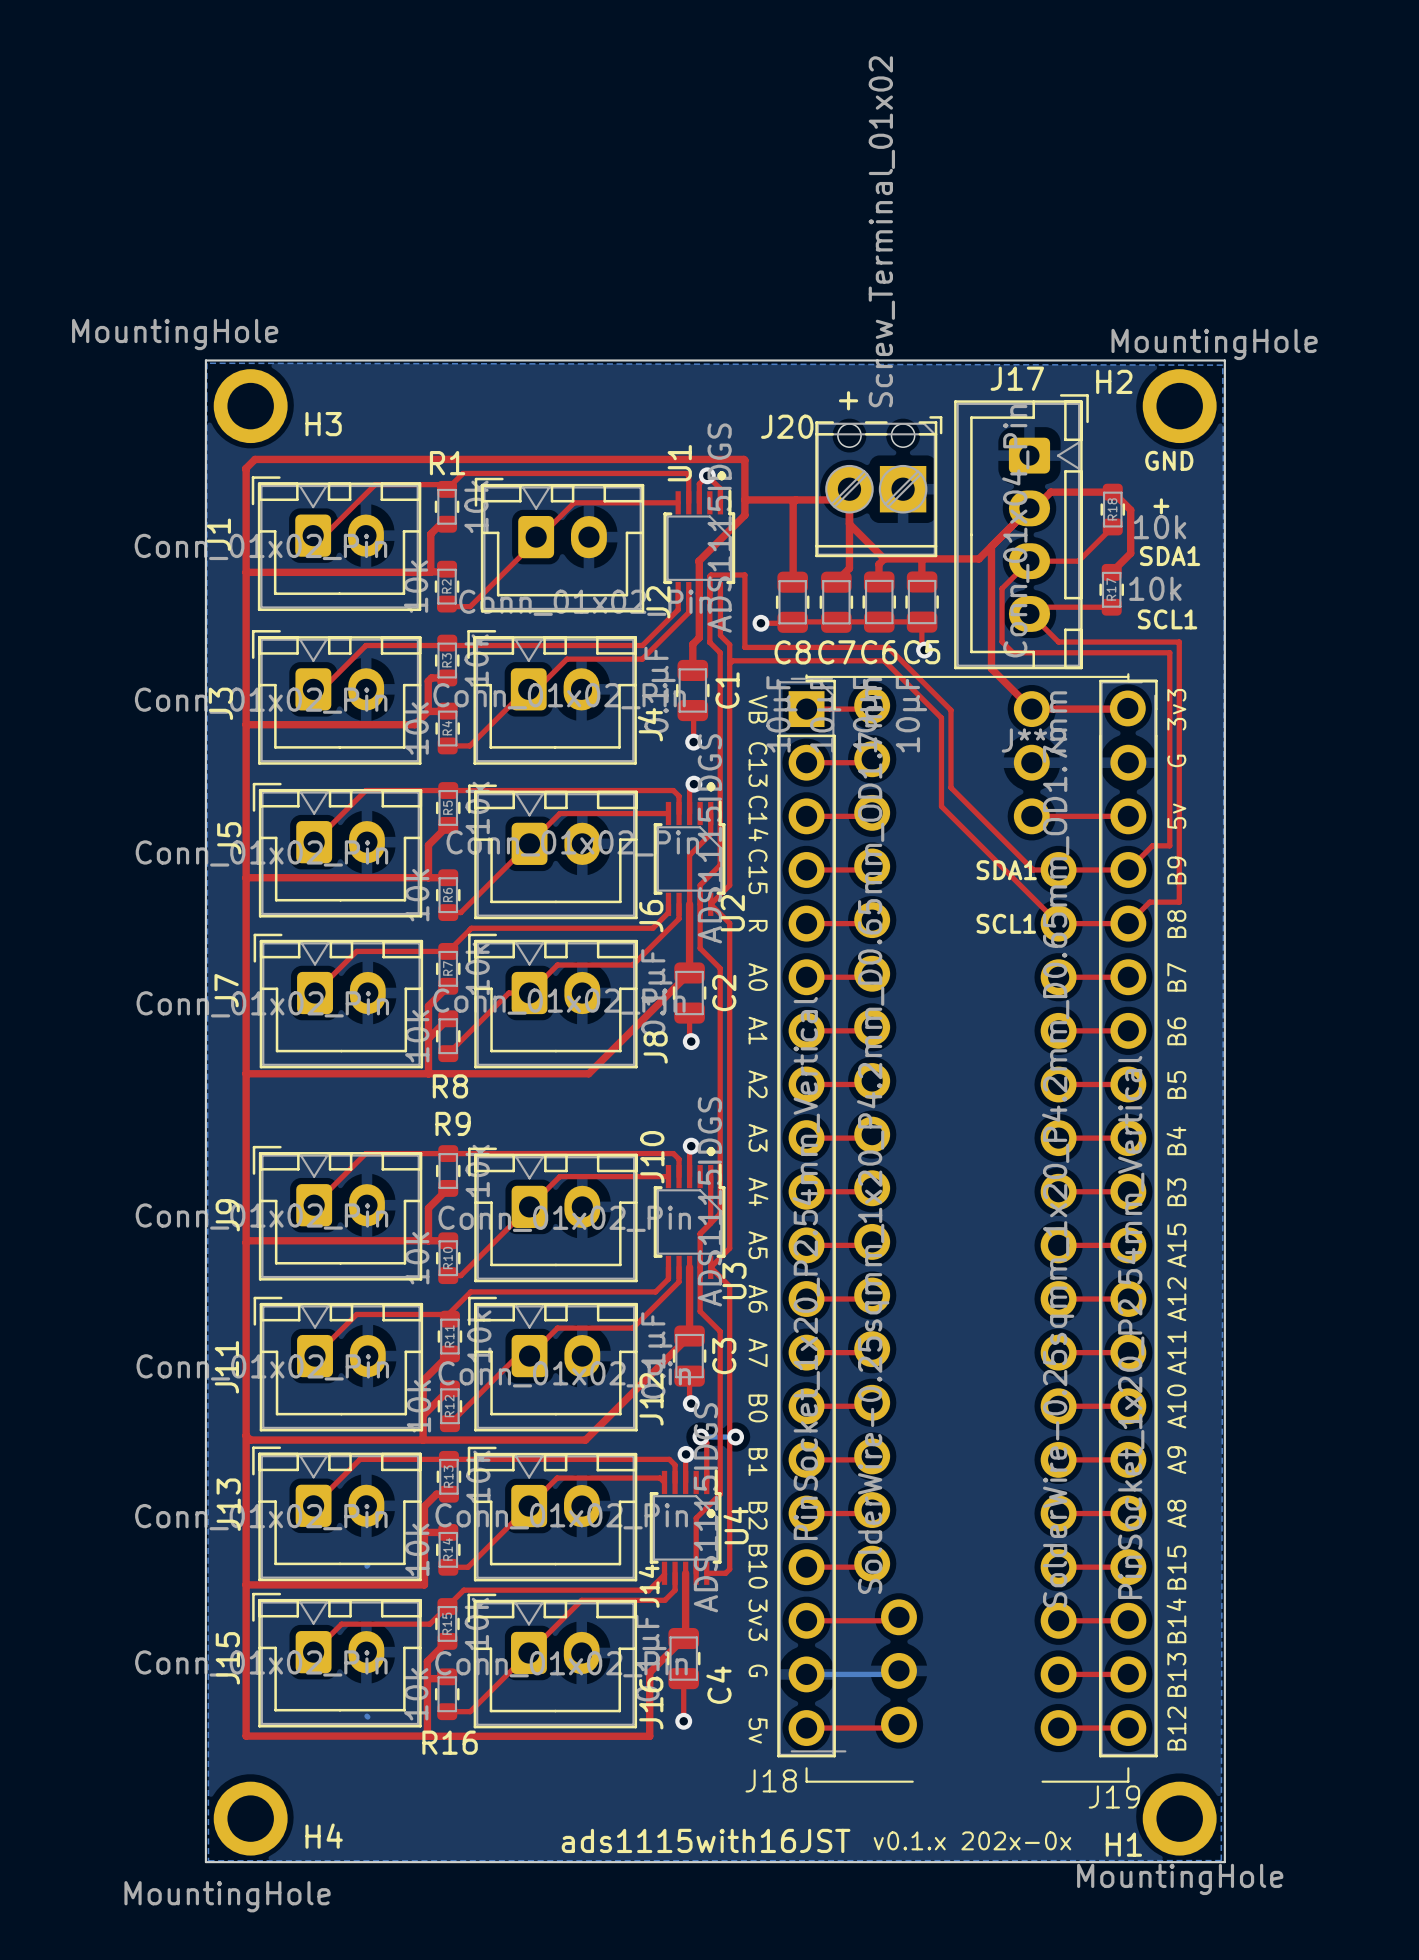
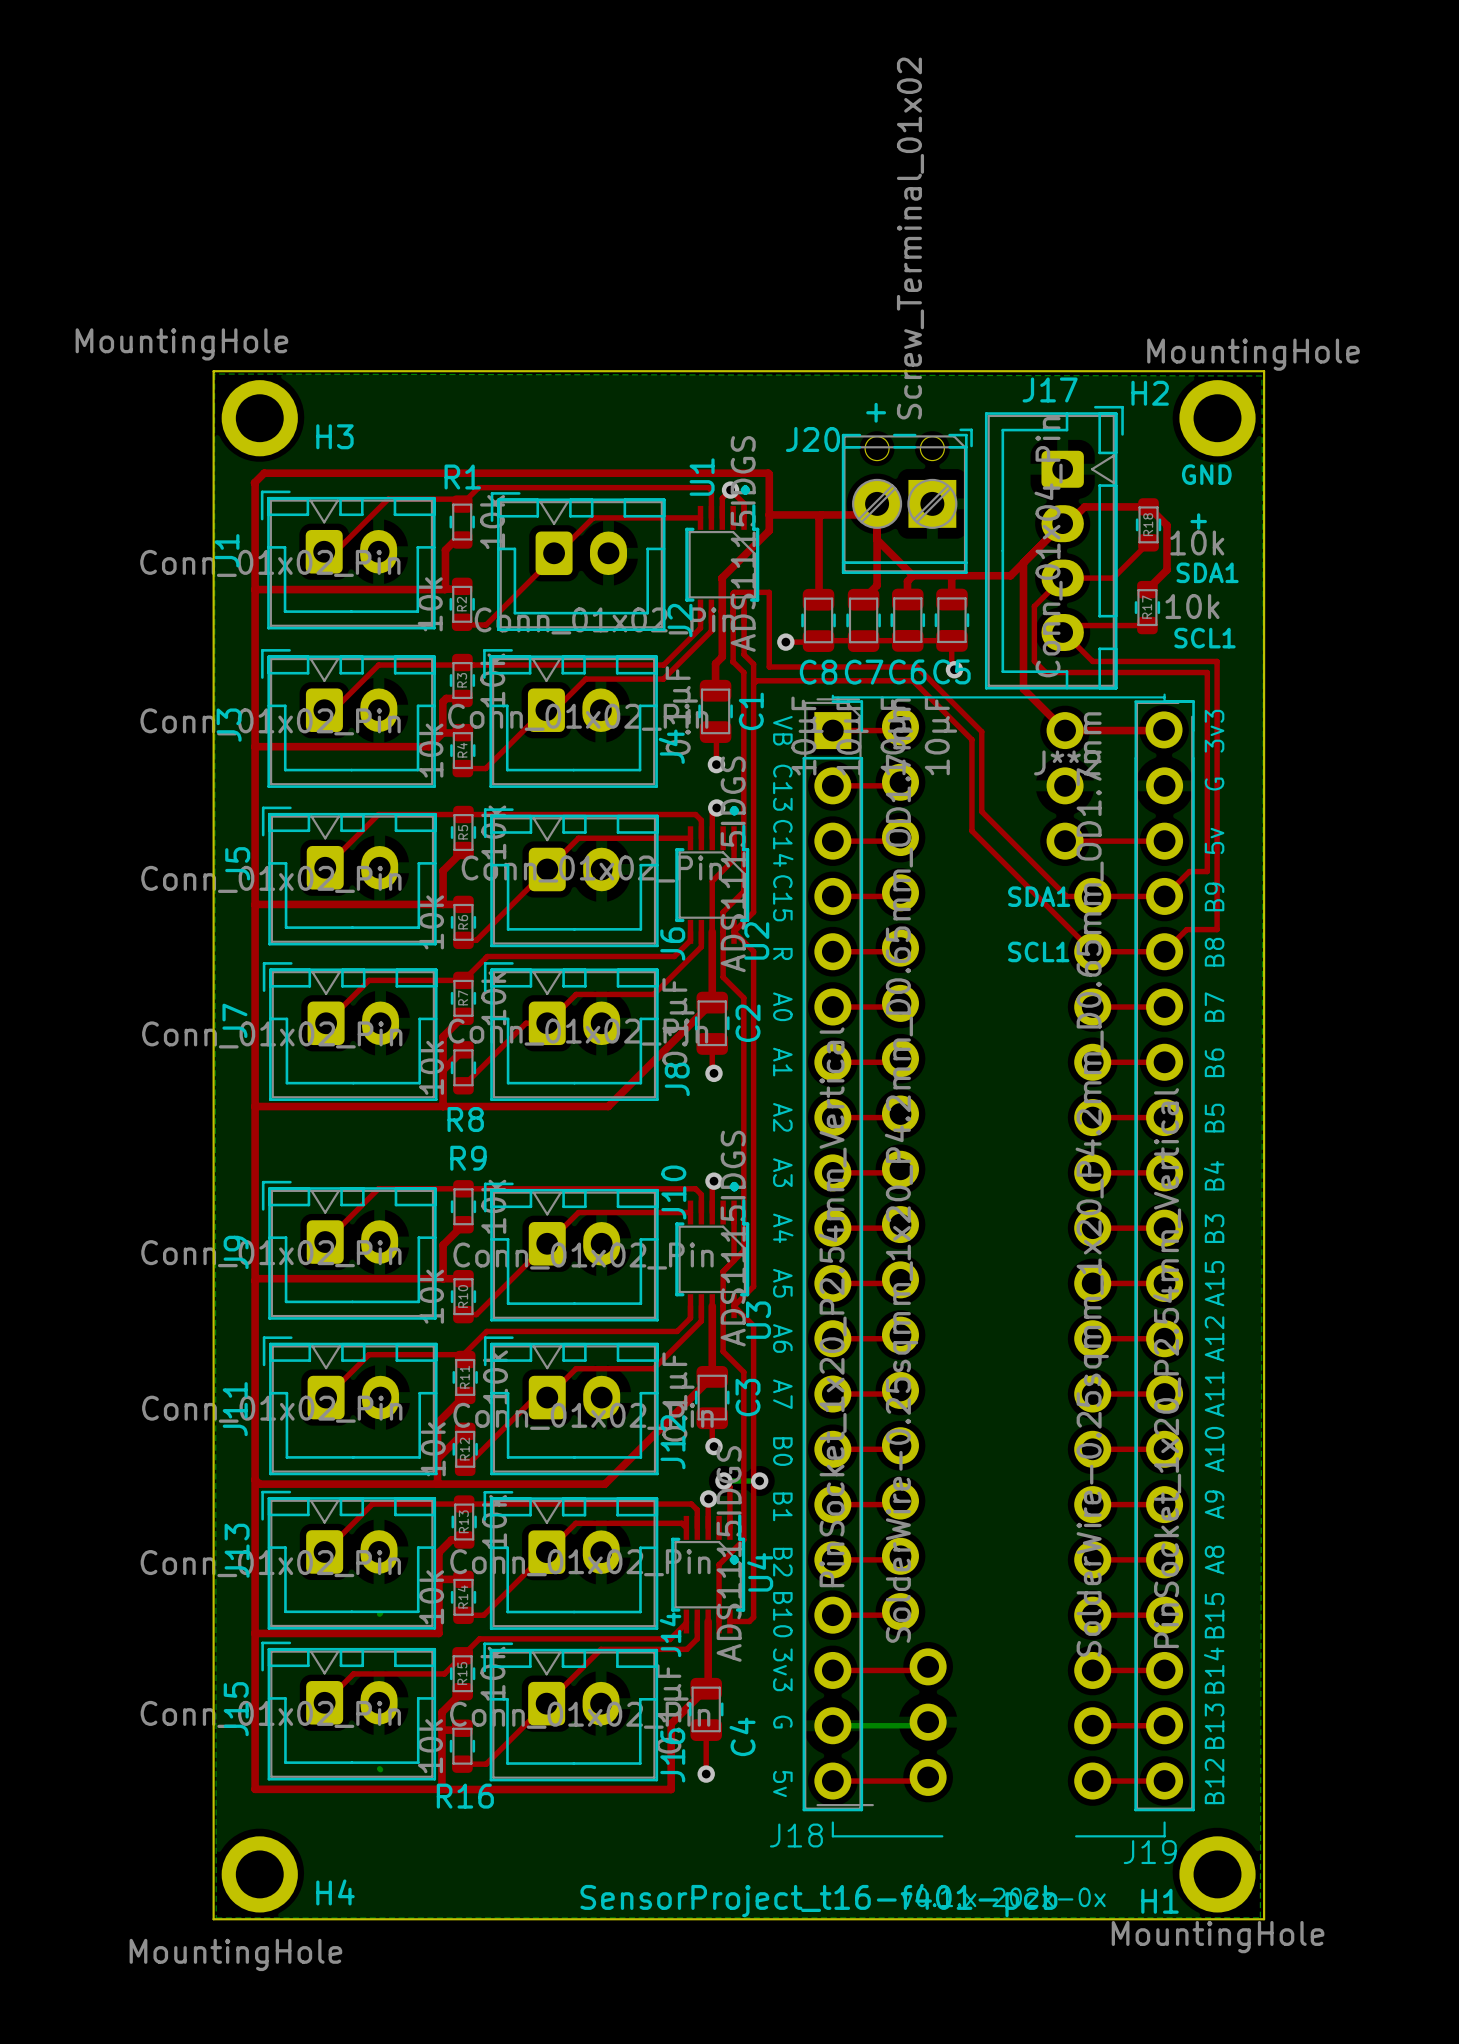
text: ads1115with16JST (706, 1840) -> SensorProject_t16-f401-pcb (818, 1900)

